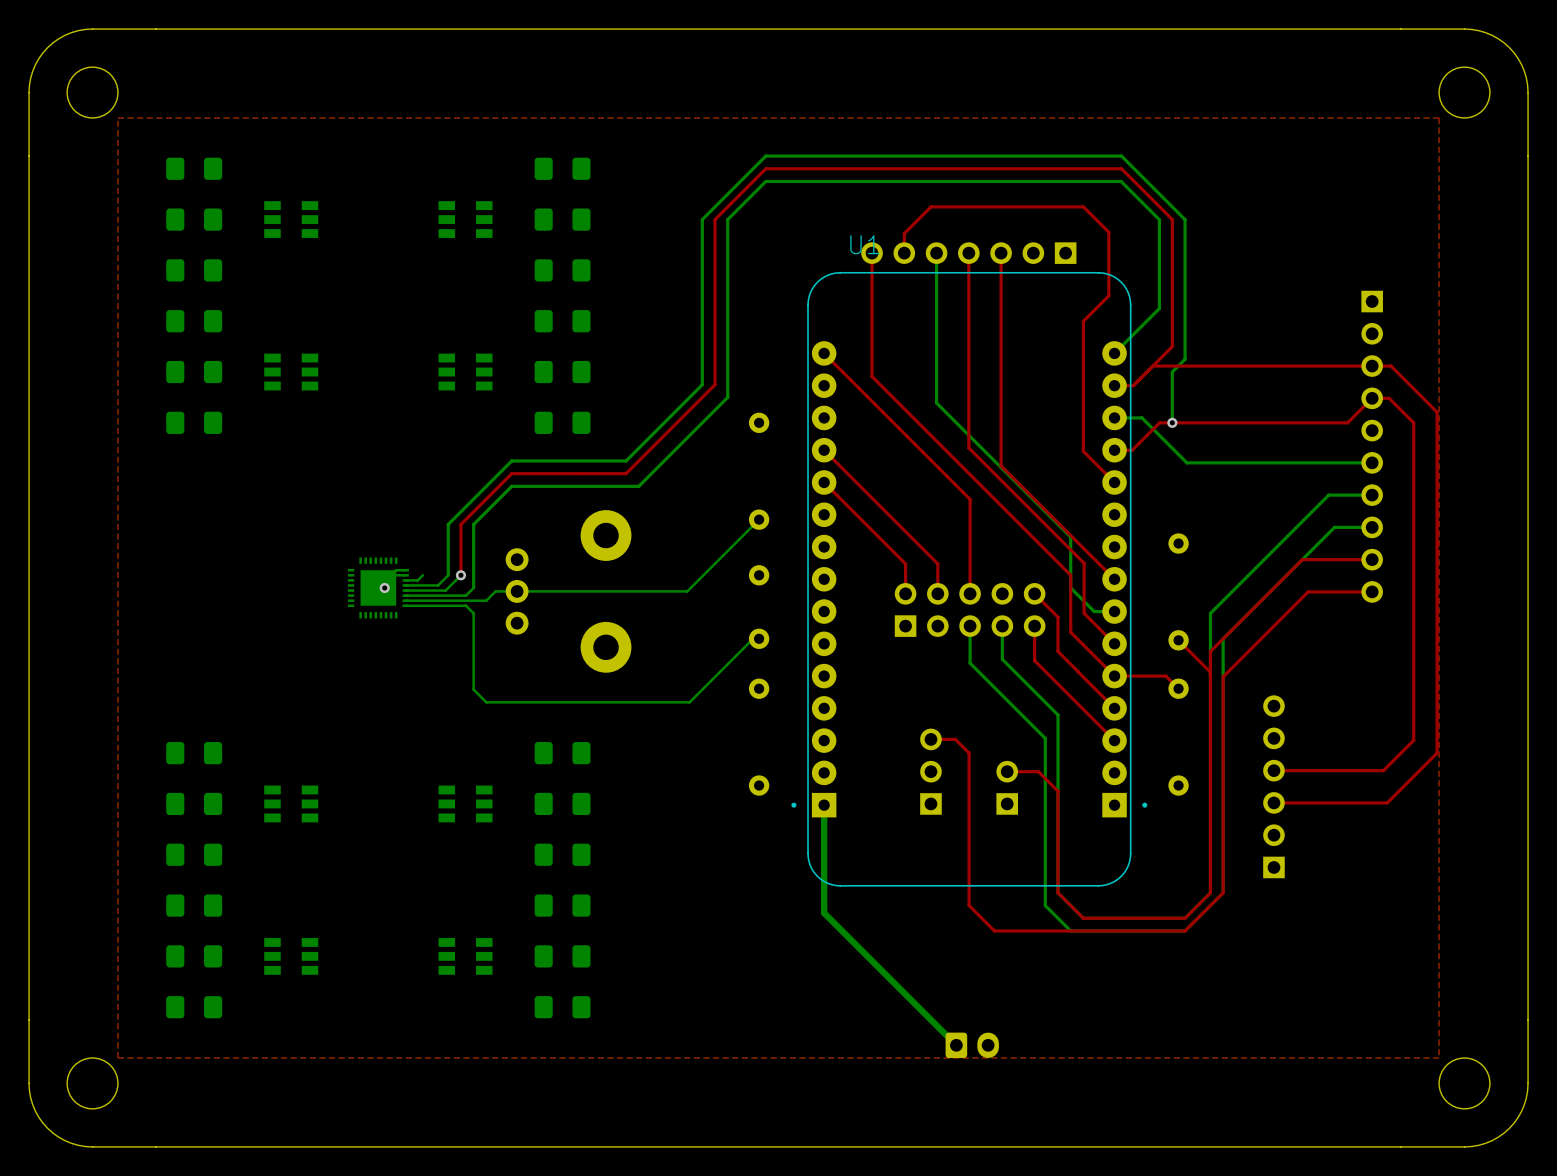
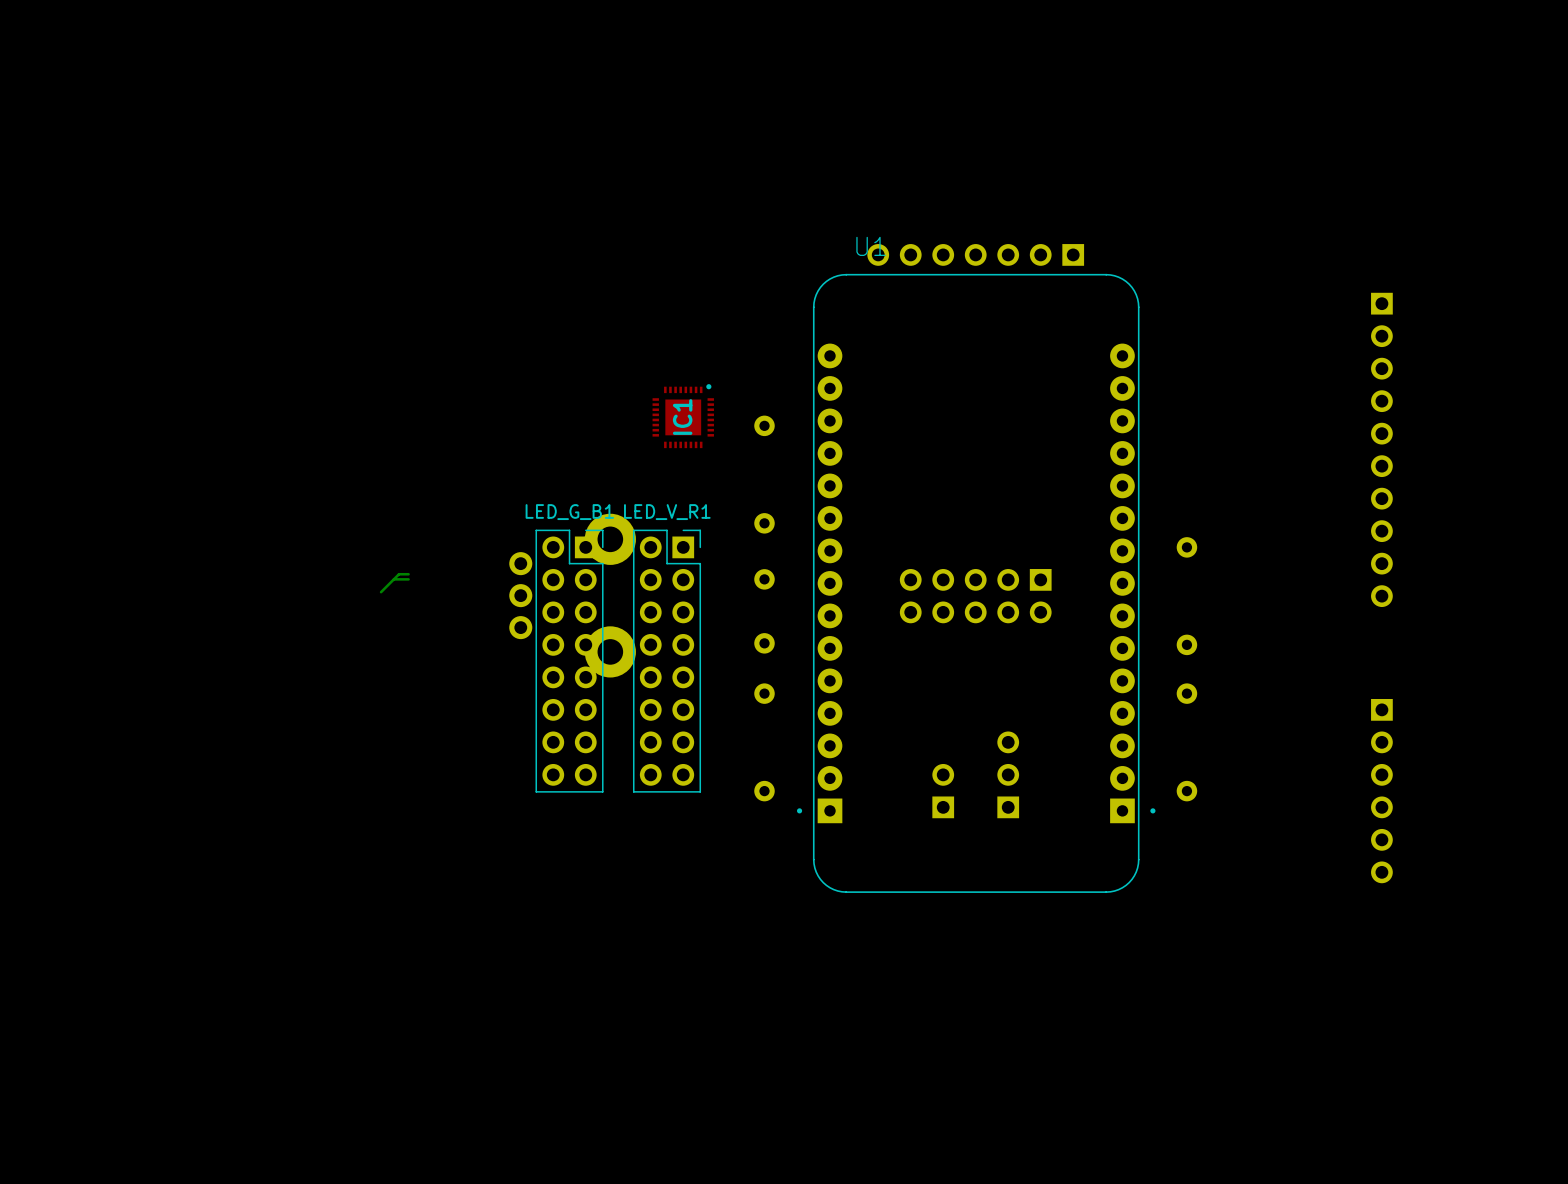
board edge: (92, 29) (1464, 29) (1485, 32) (1504, 42) (1514, 52) (1521, 65) (1526, 78) (1528, 92) (1528, 1083) (1524, 1104) (1514, 1123) (1504, 1133) (1492, 1140) (1478, 1145) (1464, 1146) (92, 1146) (71, 1143) (52, 1133) (42, 1123) (35, 1110) (30, 1097) (29, 1083) (29, 92) (30, 78) (35, 65) (47, 47) (65, 35) (78, 30) (92, 29) -> none
round board edge: [66, 66, 119, 119] -> none
round board edge: [1438, 66, 1491, 119] -> none
top zone outline: (117, 117) (117, 1058) (1439, 1058) (1439, 117) (117, 117) -> none
part: (194, 168) -> none
part: (562, 168) -> none
part: (194, 219) -> none
part: (291, 219) -> none
part: (465, 219) -> none
part: (562, 219) -> none
top track: (872, 253) (872, 376) (1070, 575) (1070, 632) (1114, 676) (1165, 676) (1178, 688) -> none
top track: (904, 253) (904, 233) (930, 206) (1083, 206) (1108, 232) (1108, 295) (1083, 321) (1083, 451) (1114, 482) -> none
bottom track: (936, 253) (936, 403) (1070, 537) (1070, 587) (1094, 611) (1114, 611) -> none
top track: (968, 253) (968, 448) (1084, 563) (1084, 613) (1114, 643) -> none
top track: (1001, 253) (1001, 465) (1114, 579) -> none
part: (194, 270) -> none
part: (562, 270) -> none
part: (194, 321) -> none
part: (562, 321) -> none
top track: (824, 353) (970, 499) (970, 593) -> none
bottom track: (1114, 353) (1159, 308) (1159, 219) (1121, 181) (765, 181) (727, 219) (727, 397) (638, 486) (511, 486) (473, 524) (473, 587) (466, 595) (405, 595) -> none
top track: (1152, 366) (1390, 366) (1437, 412) (1437, 753) (1387, 802) (1273, 802) -> none
part: (194, 372) -> none
part: (291, 372) -> none
part: (465, 372) -> none
part: (562, 372) -> none
top track: (1114, 385) (1133, 385) (1172, 346) (1172, 219) (1121, 168) (765, 168) (715, 219) (715, 384) (626, 473) (511, 473) (460, 524) (460, 575) -> none
IC1: none -> (683, 416)
bottom track: (1114, 417) (1142, 417) (1186, 462) (1372, 462) -> none
part: (194, 422) -> none
part: (562, 422) -> none
bottom track: (1172, 422) (1172, 372) (1185, 359) (1185, 219) (1121, 156) (765, 156) (702, 219) (702, 384) (626, 460) (511, 460) (448, 524) (448, 575) (438, 585) (405, 585) -> none
via: (1172, 422) -> none
top track: (824, 450) (937, 563) (937, 593) -> none
top track: (1114, 450) (1132, 450) (1159, 422) (1347, 422) (1372, 398) (1389, 398) (1413, 422) (1413, 740) (1383, 770) (1273, 770) -> none
top track: (824, 482) (905, 563) (905, 593) -> none
bottom track: (1372, 495) (1328, 495) (1210, 613) (1210, 892) (1185, 918) (1083, 918) (1058, 892) (1058, 715) (1002, 659) (1002, 626) -> none
bottom track: (759, 519) (687, 591) (495, 591) (486, 600) (405, 600) -> none
bottom track: (1372, 527) (1334, 527) (1223, 638) (1223, 892) (1185, 930) (1070, 930) (1045, 905) (1045, 738) (970, 663) (970, 626) -> none
top track: (1372, 559) (1302, 559) (1210, 651) (1210, 892) (1185, 918) (1083, 918) (1058, 892) (1058, 791) (1038, 771) (1007, 771) -> none
bottom track: (422, 575) (417, 580) (405, 580) -> none
bottom track: (460, 575) (445, 590) (405, 590) -> none
via: (460, 575) -> none
part: (378, 587) -> none
via: (384, 587) -> none
top track: (1372, 591) (1308, 591) (1223, 676) (1223, 892) (1185, 930) (994, 930) (969, 905) (969, 753) (955, 739) (930, 739) -> none
top track: (1034, 593) (1058, 617) (1058, 651) (1114, 708) -> none
bottom track: (405, 605) (466, 605) (473, 613) (473, 689) (486, 702) (689, 702) (753, 638) (759, 638) -> none
part rotation: 0° (970, 609) -> 180° (975, 596)
top track: (1034, 626) (1034, 660) (1114, 740) -> none
top track: (1185, 638) (1178, 640) (1210, 672) -> none
LED_G_B1: none -> (569, 661)
LED_V_R1: none -> (667, 661)
part: (194, 753) -> none
part: (562, 753) -> none
part position: (930, 771) -> (1008, 774)
part rotation: 0° (1273, 786) -> 180° (1381, 791)
part position: (1007, 787) -> (943, 791)
part: (194, 803) -> none
part: (291, 803) -> none
part: (465, 803) -> none
part: (562, 803) -> none
bottom track: (824, 805) (824, 913) (956, 1045) -> none
part: (194, 854) -> none
part: (562, 854) -> none
part: (194, 905) -> none
part: (562, 905) -> none
part: (194, 956) -> none
part: (291, 956) -> none
part: (465, 956) -> none
part: (562, 956) -> none
part: (194, 1007) -> none
part: (562, 1007) -> none
part: (972, 1045) -> none
round board edge: [66, 1057, 119, 1110] -> none
round board edge: [1438, 1057, 1491, 1110] -> none

